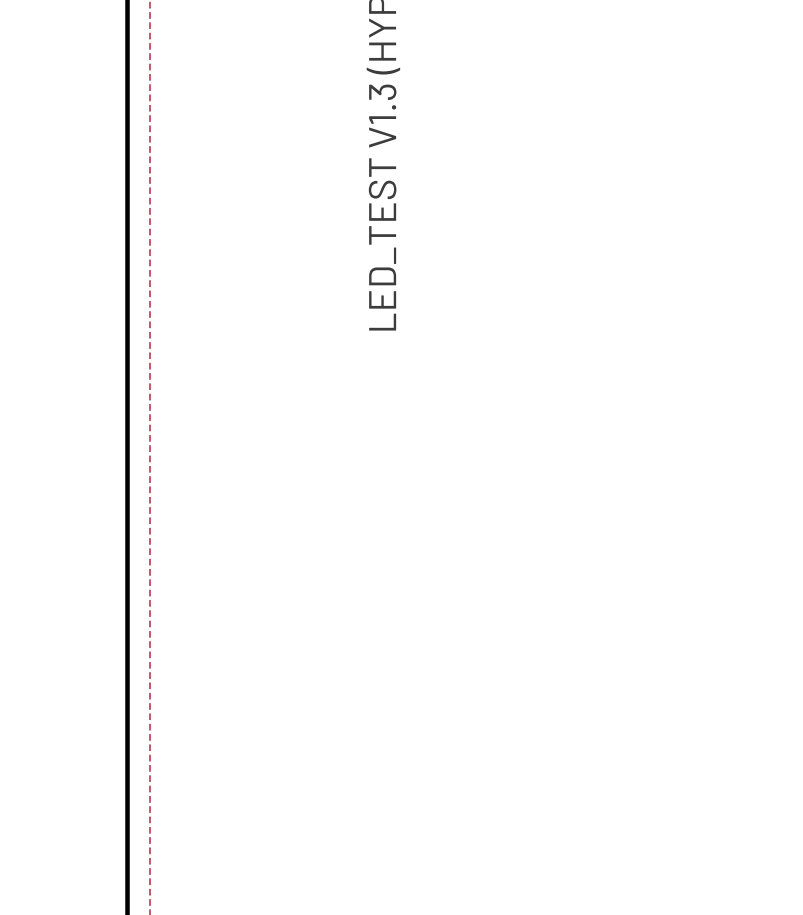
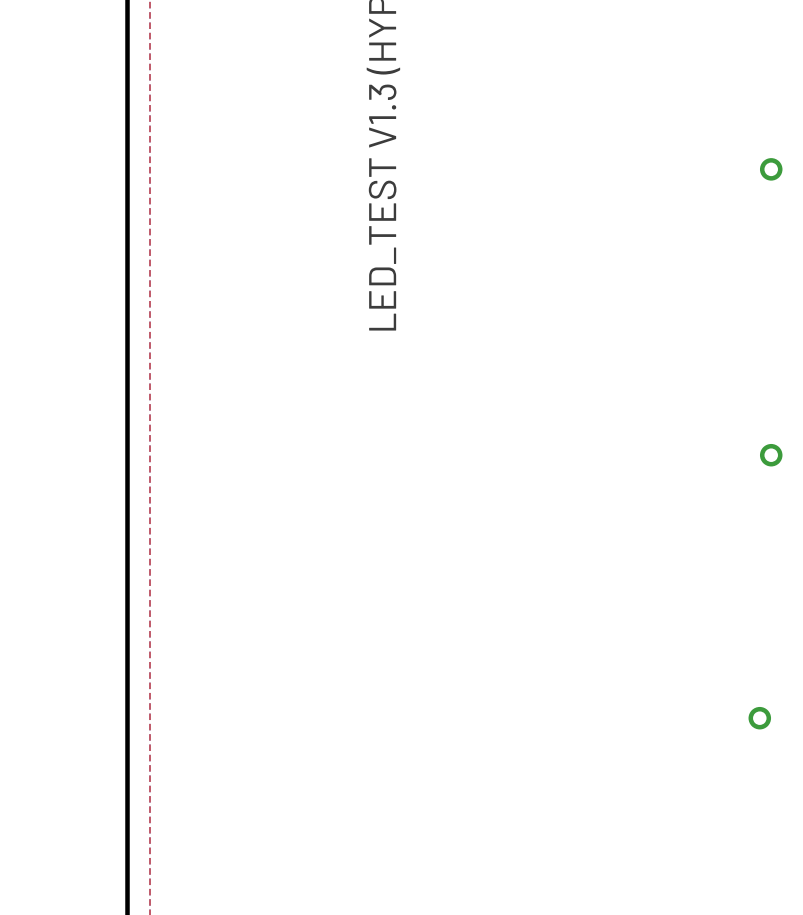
via: none -> (771, 169)
via: none -> (771, 455)
via: none -> (759, 718)

